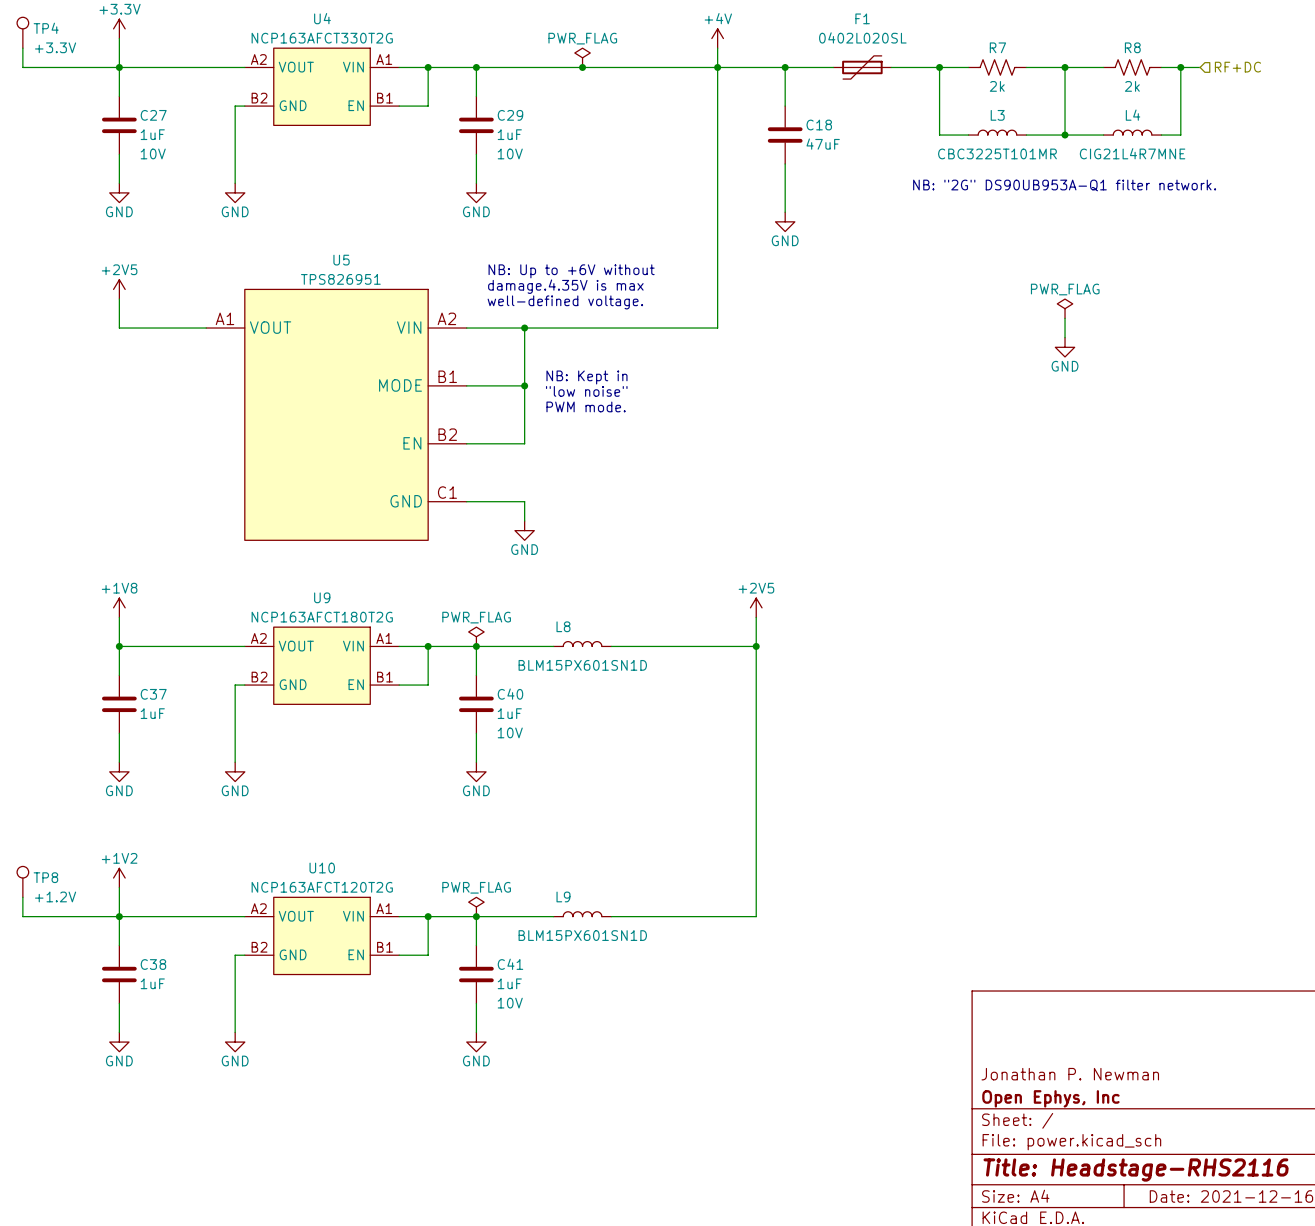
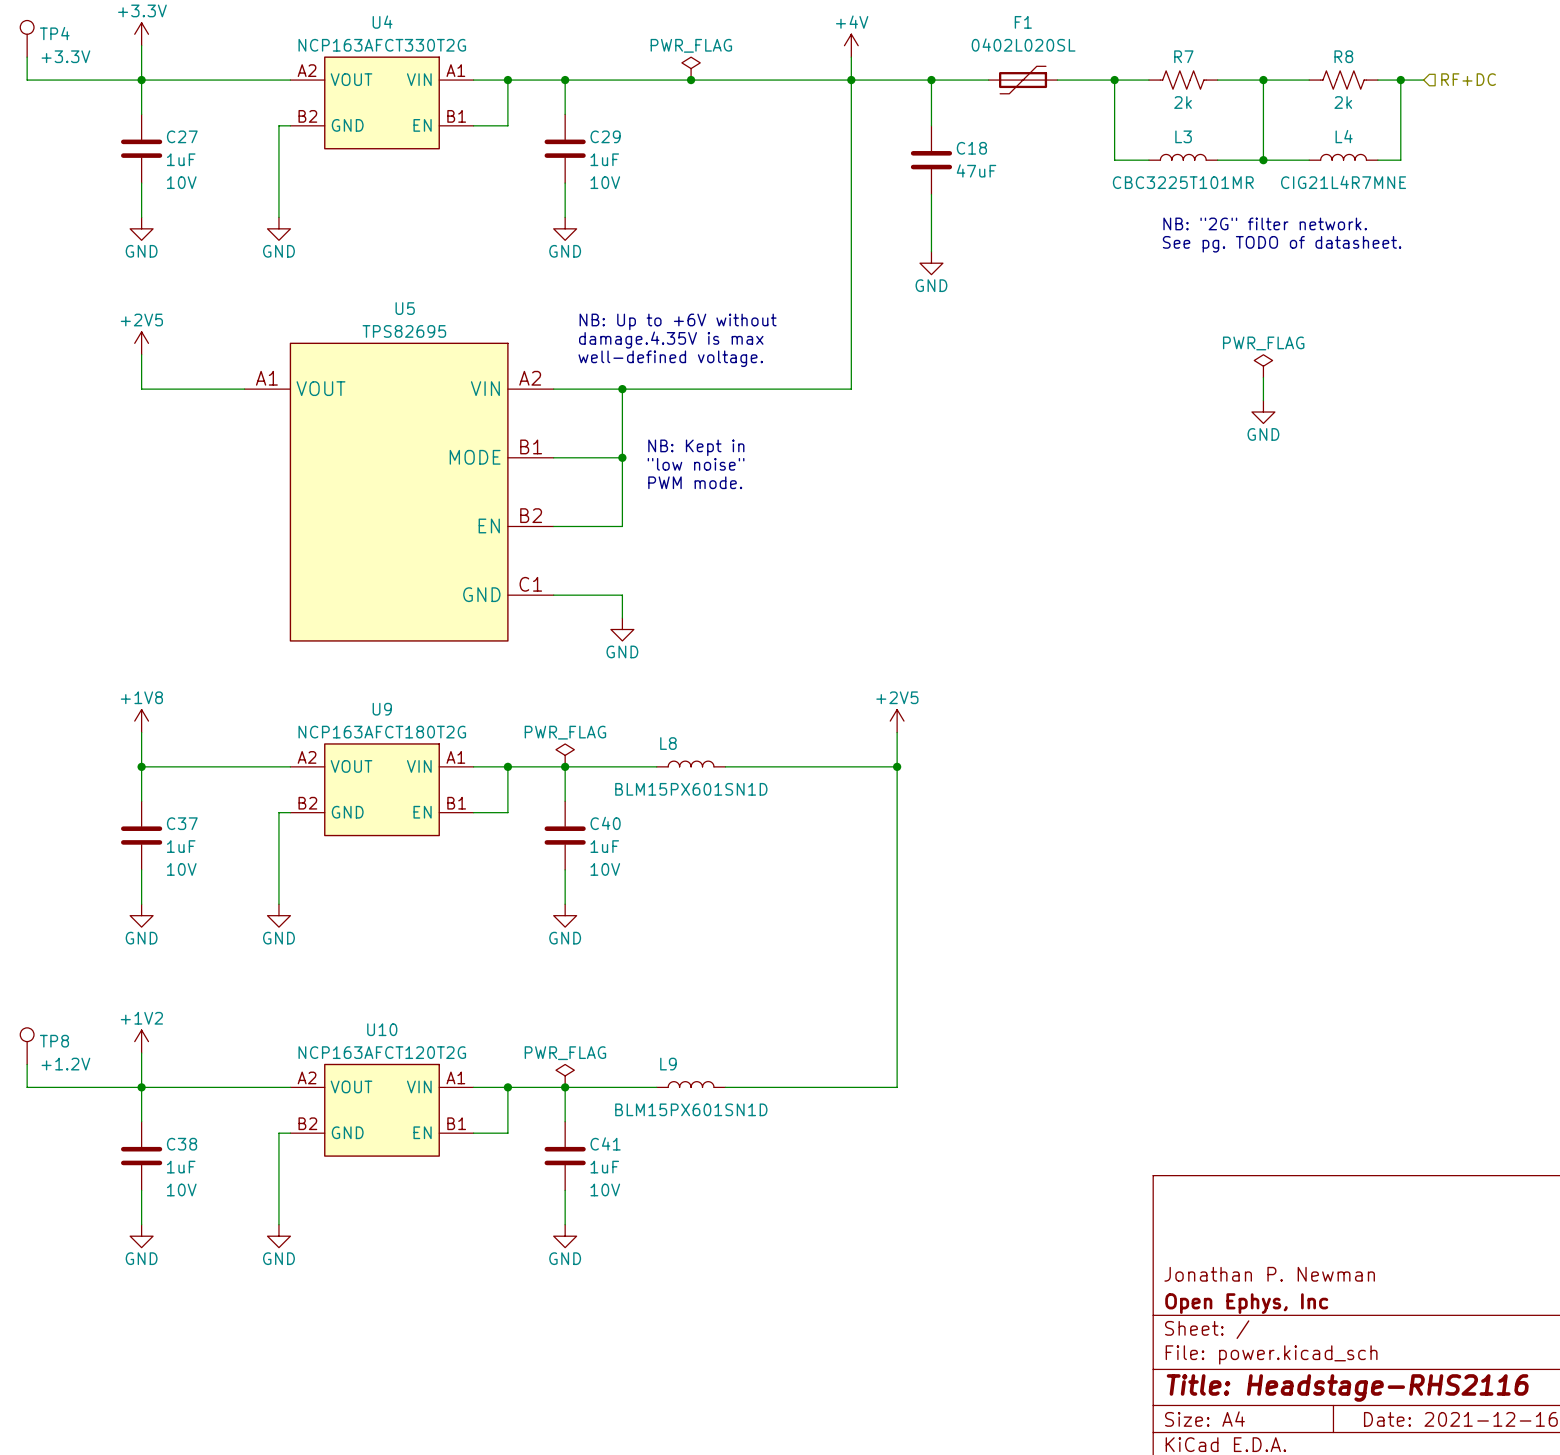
text: NB: "2G" DS90UB953A-Q1 filter network. (1064, 185) -> NB: "2G" filter network. (1265, 223)
text: none -> See pg. TODO of datasheet. (1282, 244)
U5 value: TPS826951 (340, 279) -> TPS82695 (404, 331)
C37 text: none -> 10V (181, 869)
C38 text: none -> 10V (181, 1189)

